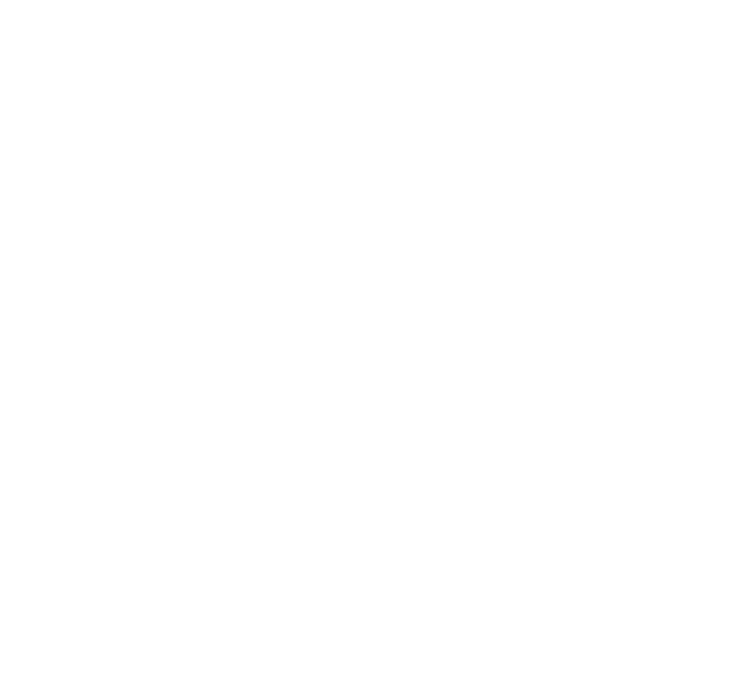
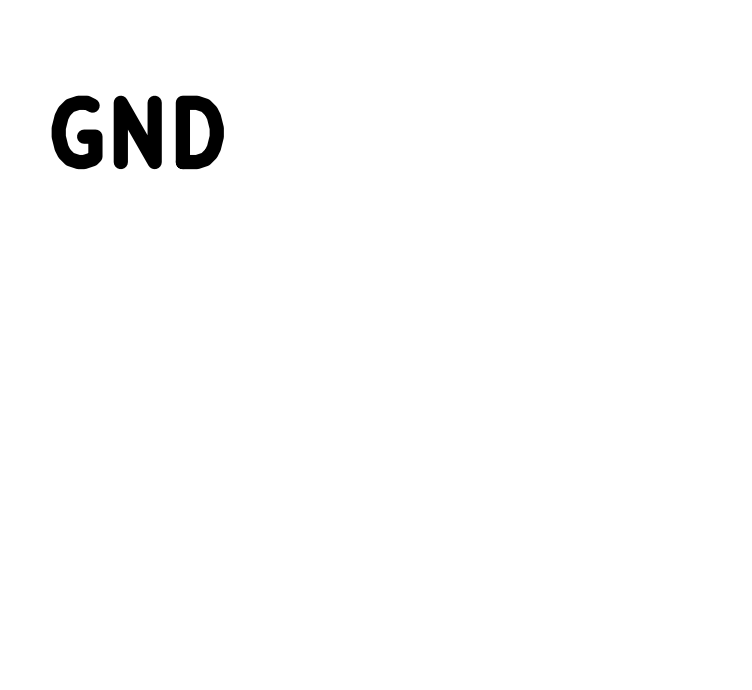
text: none -> GND (137, 132)

